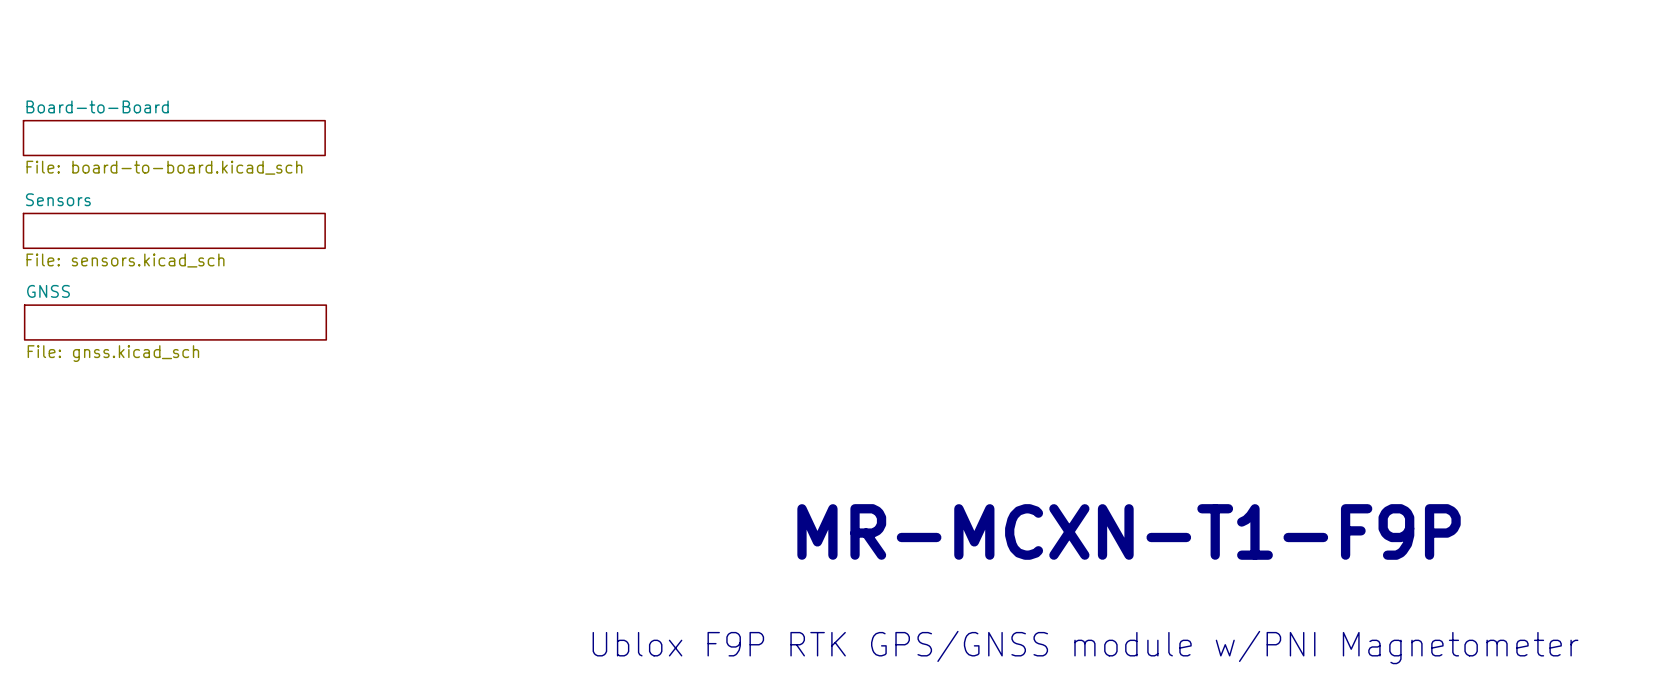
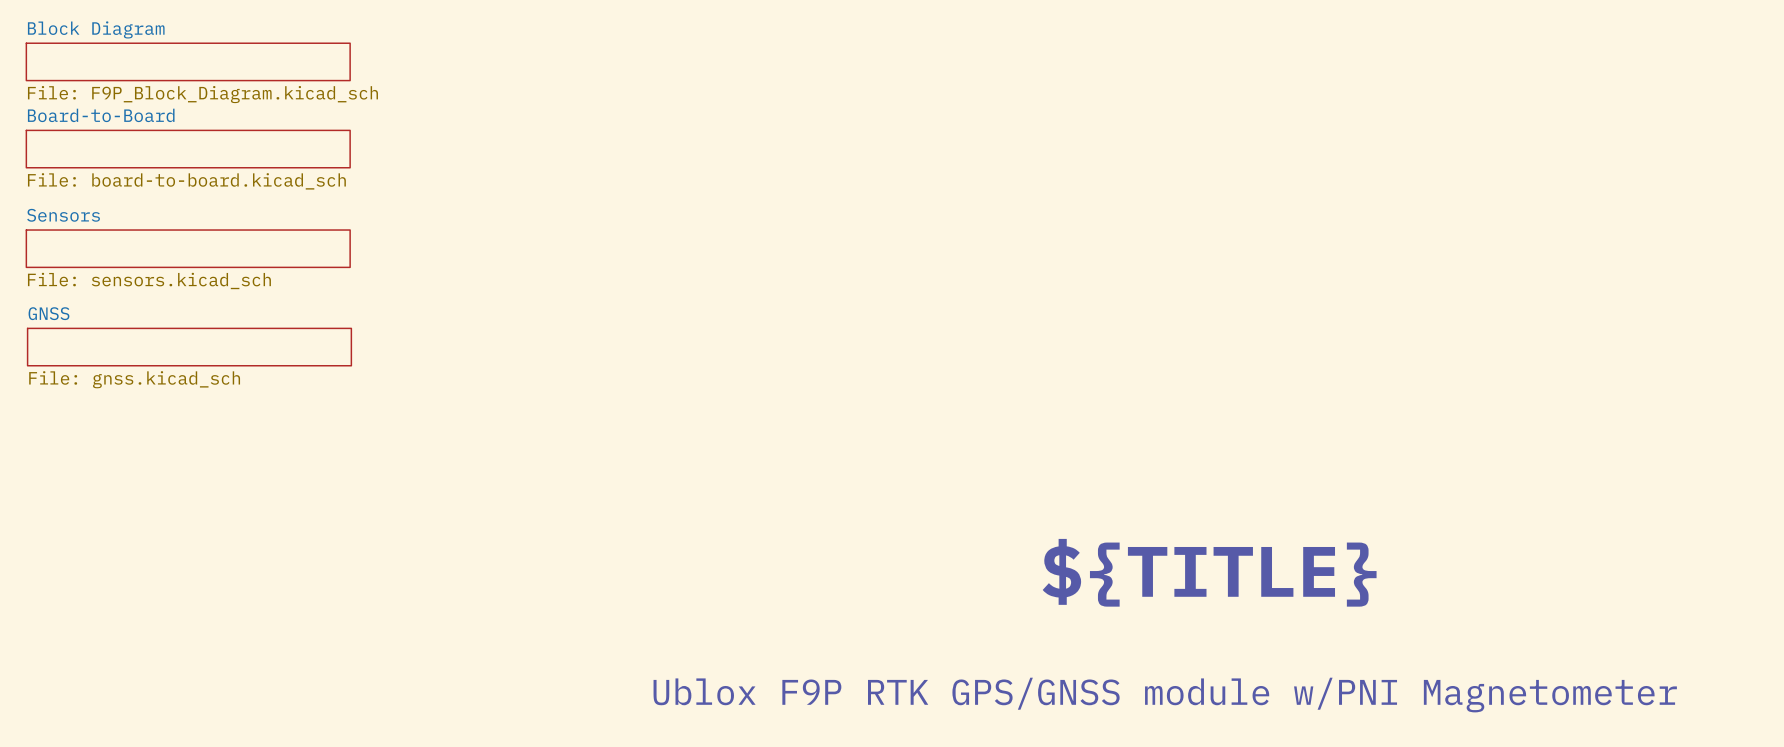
sheet Block Diagram: none -> File: F9P_Block_Diagram.kicad_sch (188, 61)
text: MR-MCXN-T1-F9P (1129, 531) -> ${TITLE} (1209, 572)

